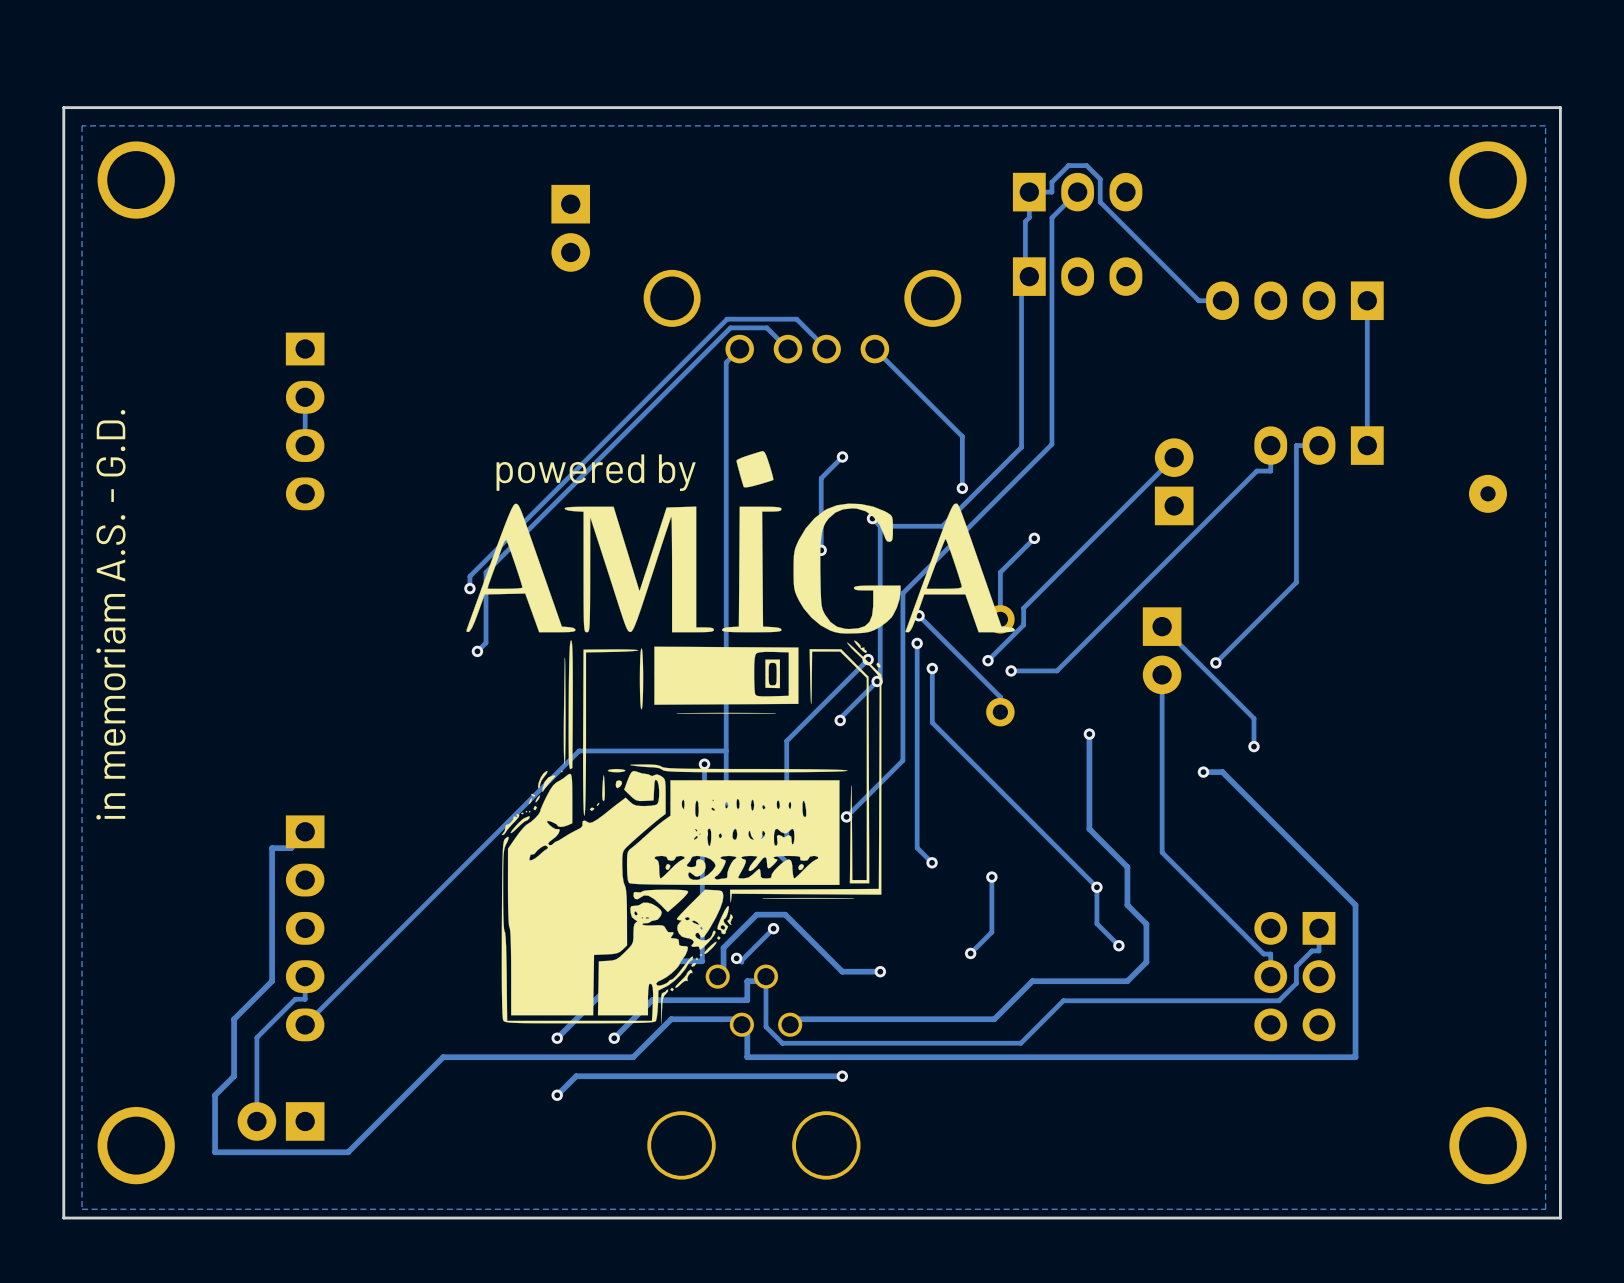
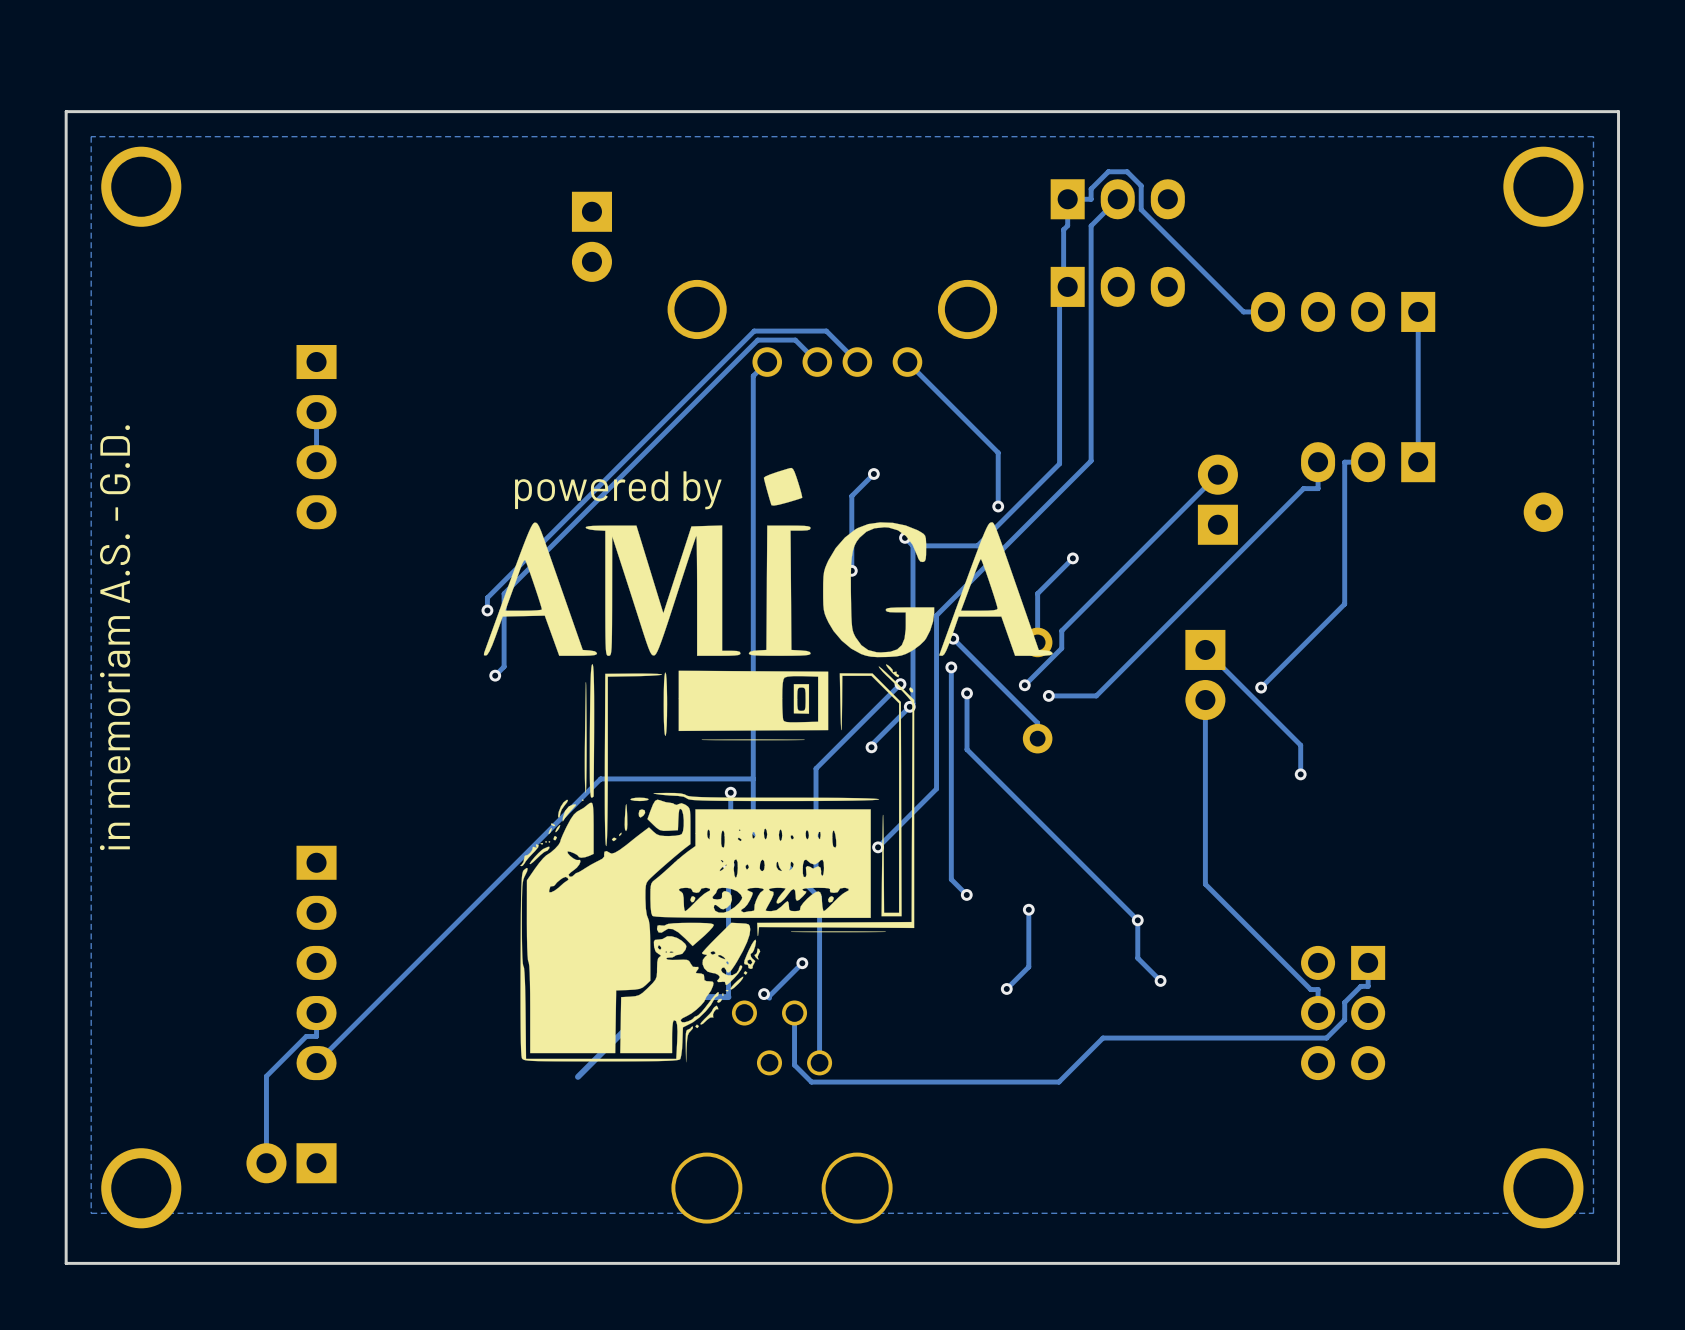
zone outline: (1545, 125) (1545, 1209) (82, 1209) (82, 125) (1545, 125) -> (1593, 136) (1593, 1213) (91, 1213) (91, 136) (1593, 136)
track: (1089, 734) (1089, 829) (1127, 867) (1127, 905) (1146, 924) (1146, 962) (1127, 981) (1032, 981) (994, 1019) (785, 1019) (790, 1024) -> (819, 897) (819, 1062)
via: (1089, 734) -> none
track: (1203, 772) (1222, 772) (1355, 905) (1355, 1057) (747, 1057) (747, 1019) (671, 1019) (633, 1057) (443, 1057) (348, 1152) (215, 1152) (215, 1095) (234, 1076) (234, 1019) (272, 981) (272, 848) (291, 848) (310, 829) (305, 831) -> none
via: (1203, 772) -> none
track: (880, 971) (842, 971) (785, 914) (756, 914) (723, 947) (723, 971) (717, 976) -> none
via: (880, 971) -> none
track: (766, 976) (766, 981) (747, 981) (747, 1000) (652, 1000) (614, 1038) -> none
via: (557, 1038) -> none
via: (614, 1038) -> none
track: (842, 1076) (576, 1076) (557, 1095) -> none
via: (842, 1076) -> none
via: (557, 1095) -> none

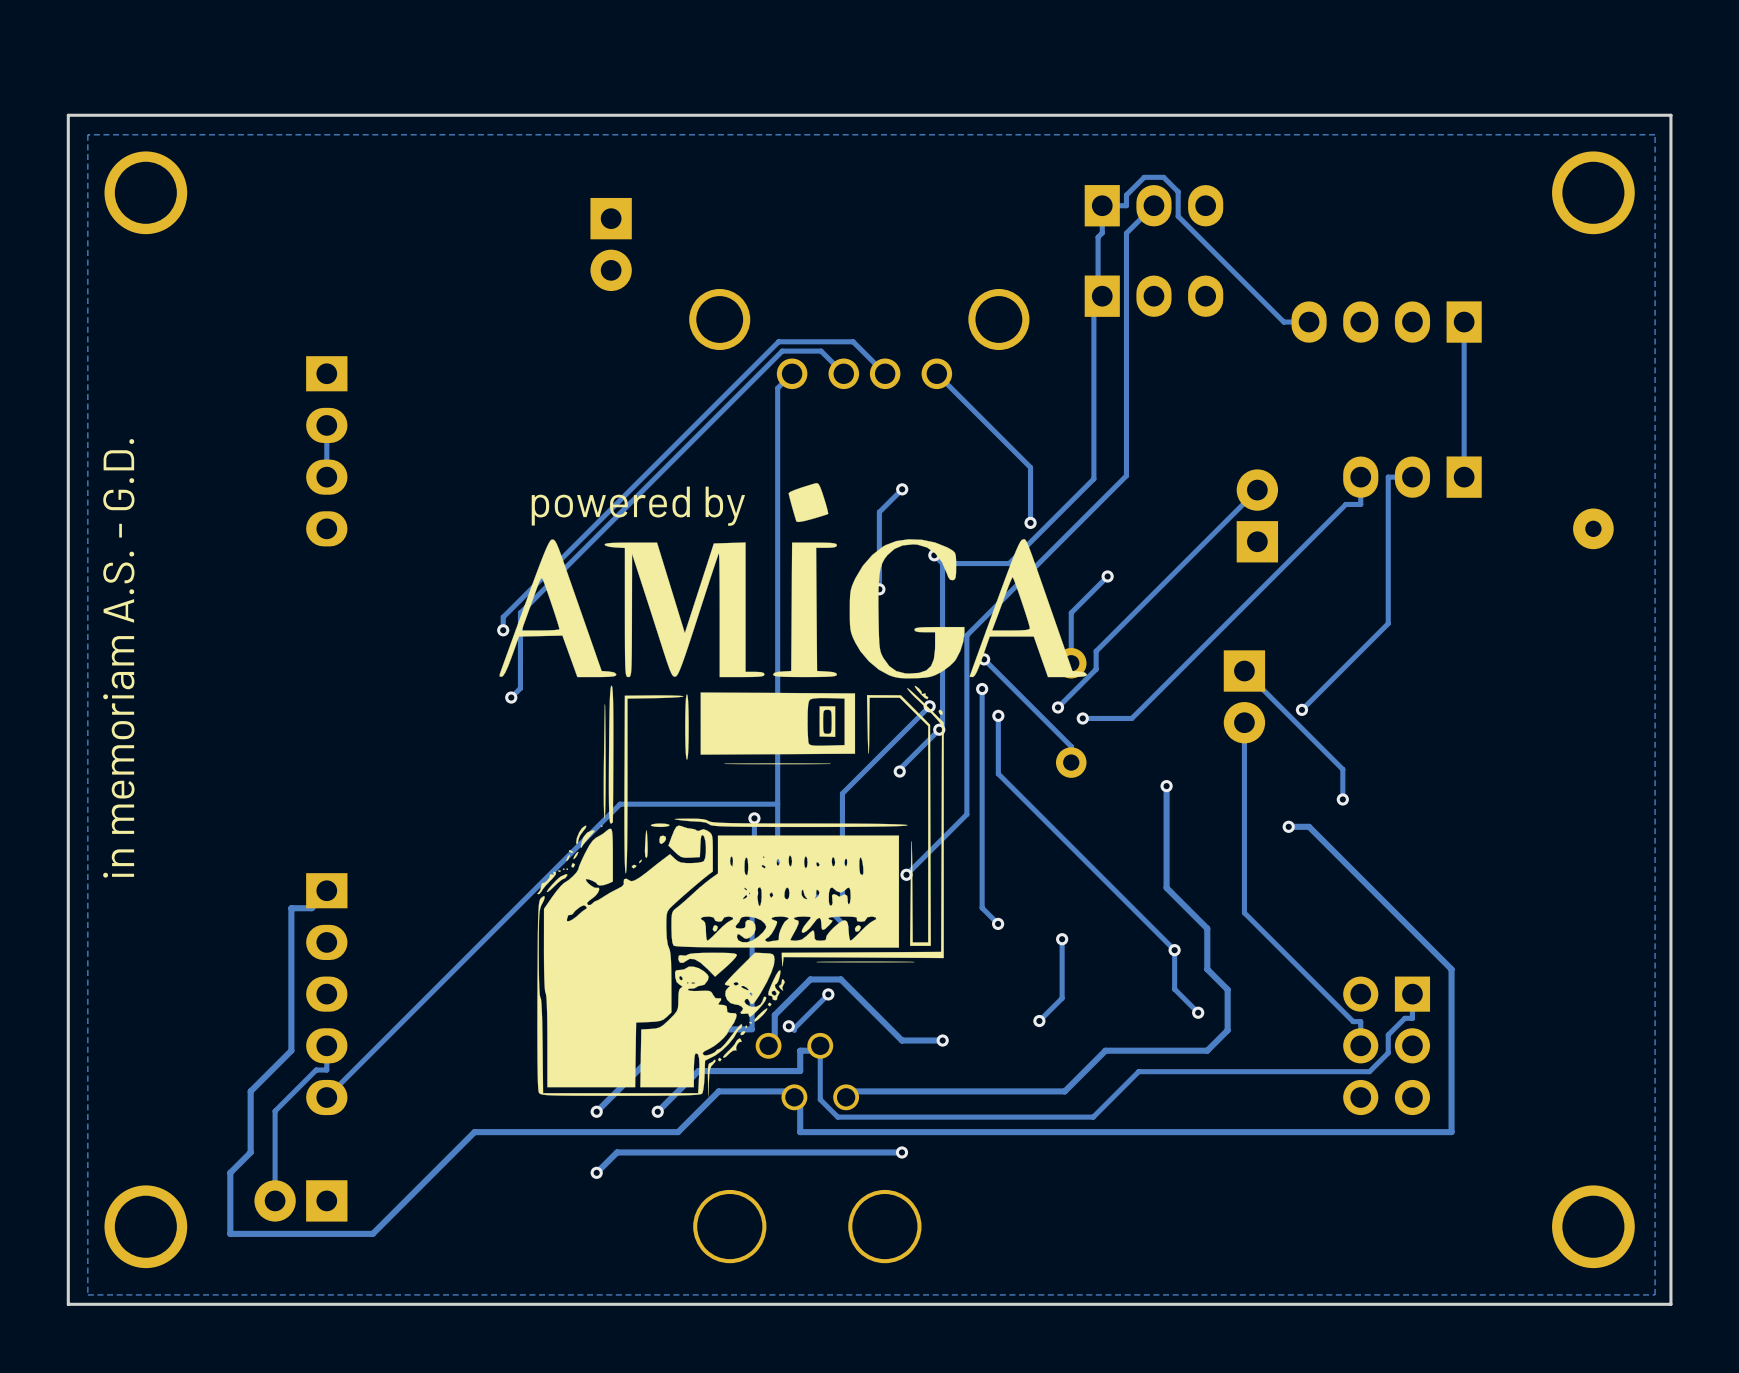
zone outline: (1593, 136) (1593, 1213) (91, 1213) (91, 136) (1593, 136) -> (1655, 134) (1655, 1294) (87, 1294) (87, 134) (1655, 134)
via: none -> (1166, 786)
track: none -> (1288, 826) (1309, 826) (1451, 969) (1451, 1132) (800, 1132) (800, 1091) (718, 1091) (678, 1132) (474, 1132) (372, 1233) (230, 1233) (230, 1172) (250, 1152) (250, 1091) (291, 1050) (291, 908) (311, 908) (332, 887) (326, 890)
via: none -> (1288, 826)
track: (819, 897) (819, 1062) -> (1166, 786) (1166, 887) (1207, 928) (1207, 969) (1227, 989) (1227, 1030) (1207, 1050) (1105, 1050) (1064, 1091) (840, 1091) (846, 1097)
track: none -> (942, 1040) (901, 1040) (840, 979) (810, 979) (774, 1015) (774, 1040) (768, 1045)
via: none -> (942, 1040)
track: none -> (820, 1045) (820, 1050) (800, 1050) (800, 1071) (698, 1071) (657, 1111)
via: none -> (596, 1111)
via: none -> (657, 1111)
track: none -> (901, 1152) (617, 1152) (596, 1172)
via: none -> (901, 1152)
via: none -> (596, 1172)

